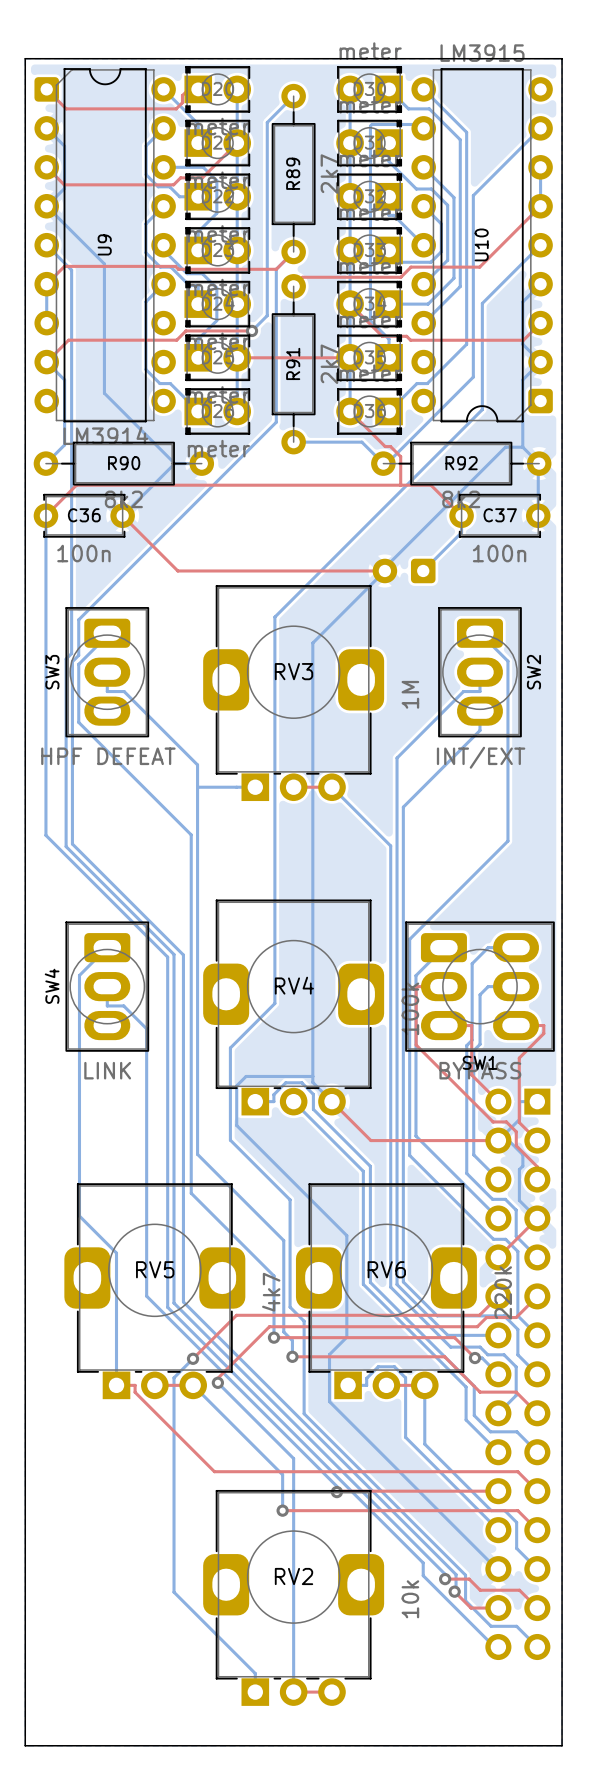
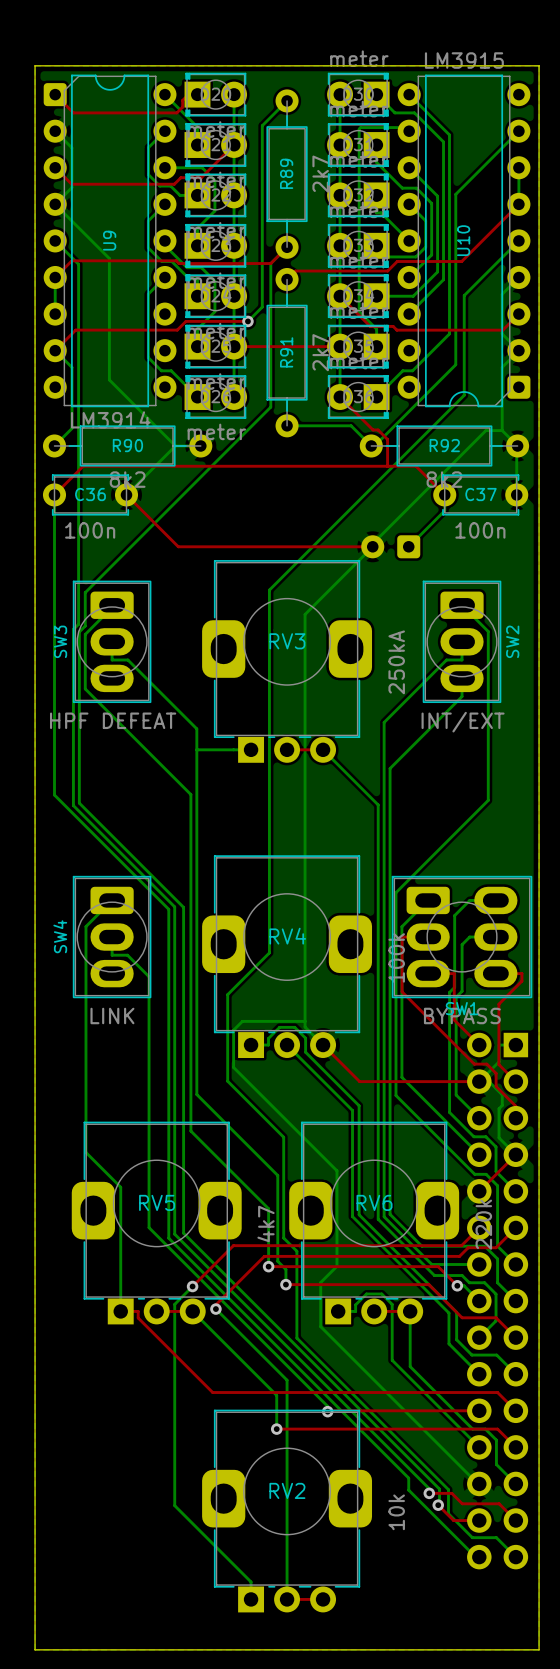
RV3 value: 1M (410, 694) -> 250kA (396, 662)

